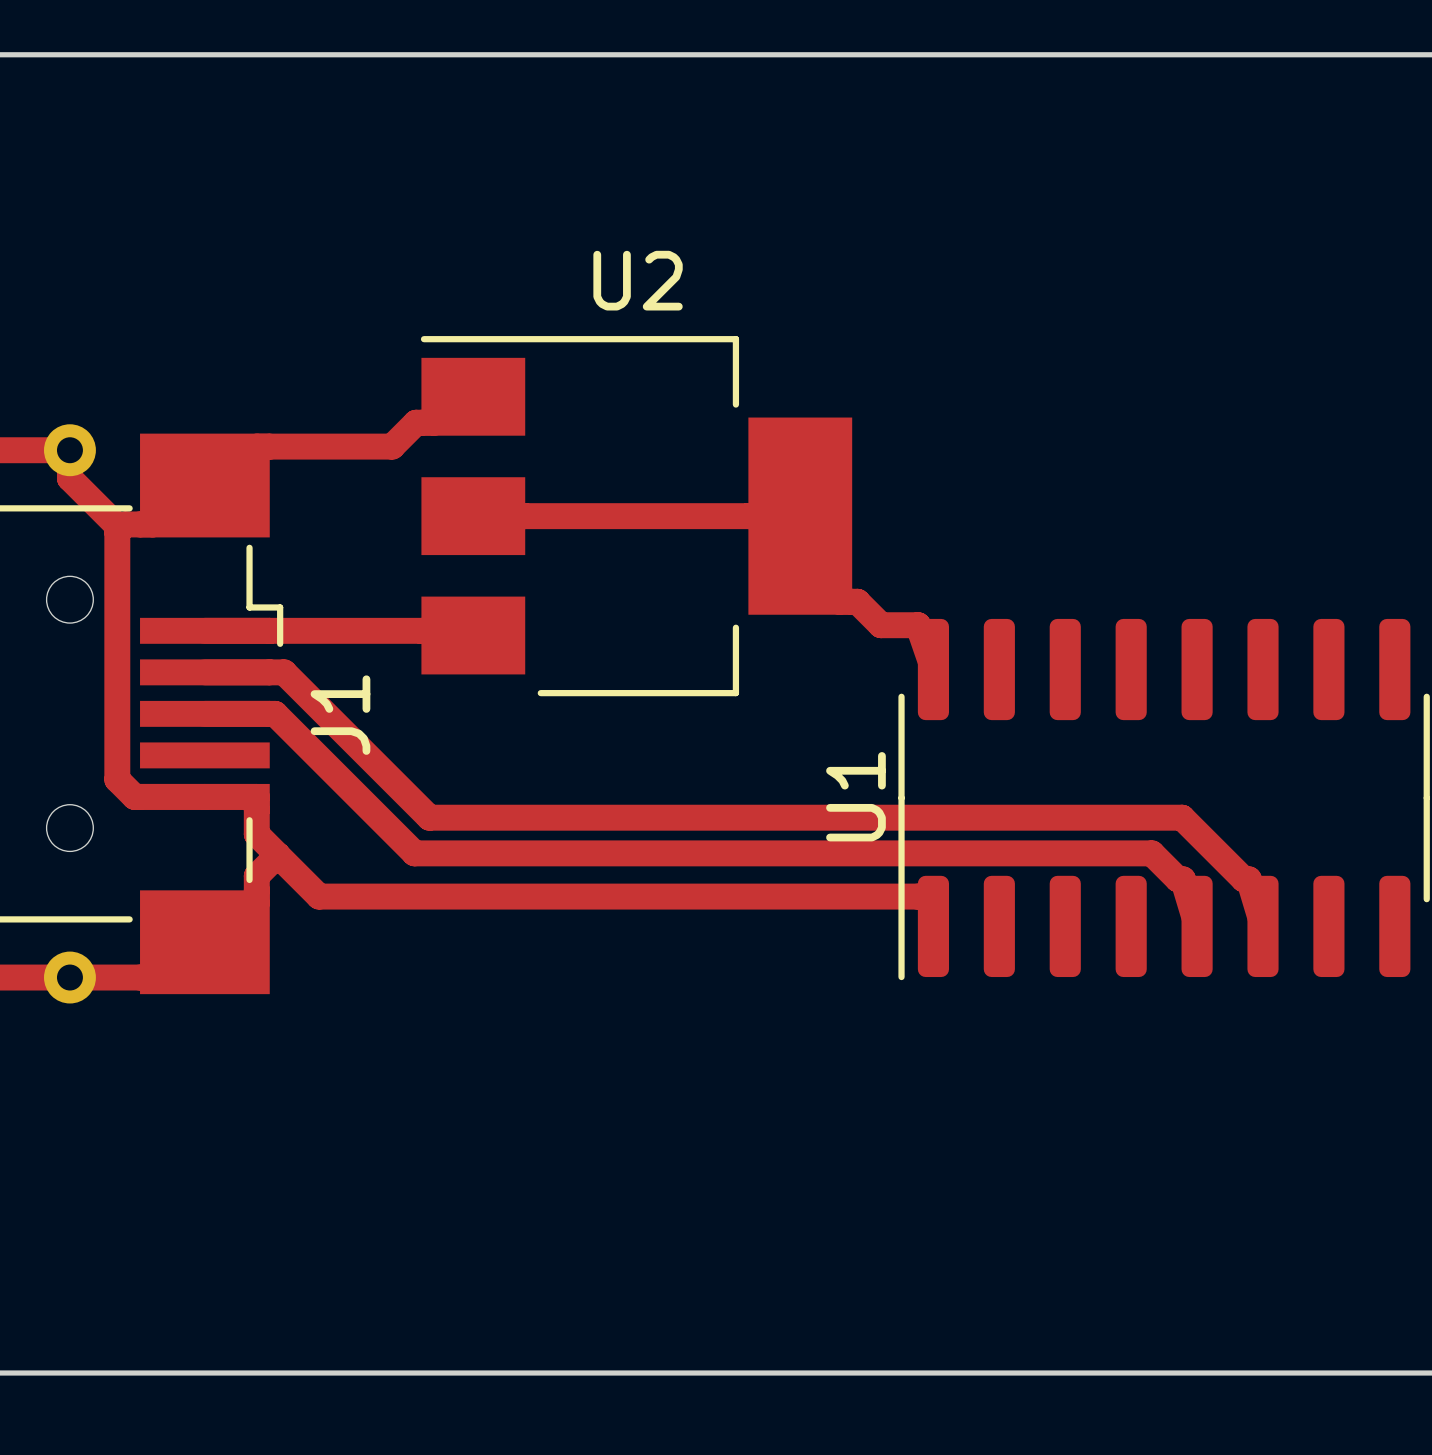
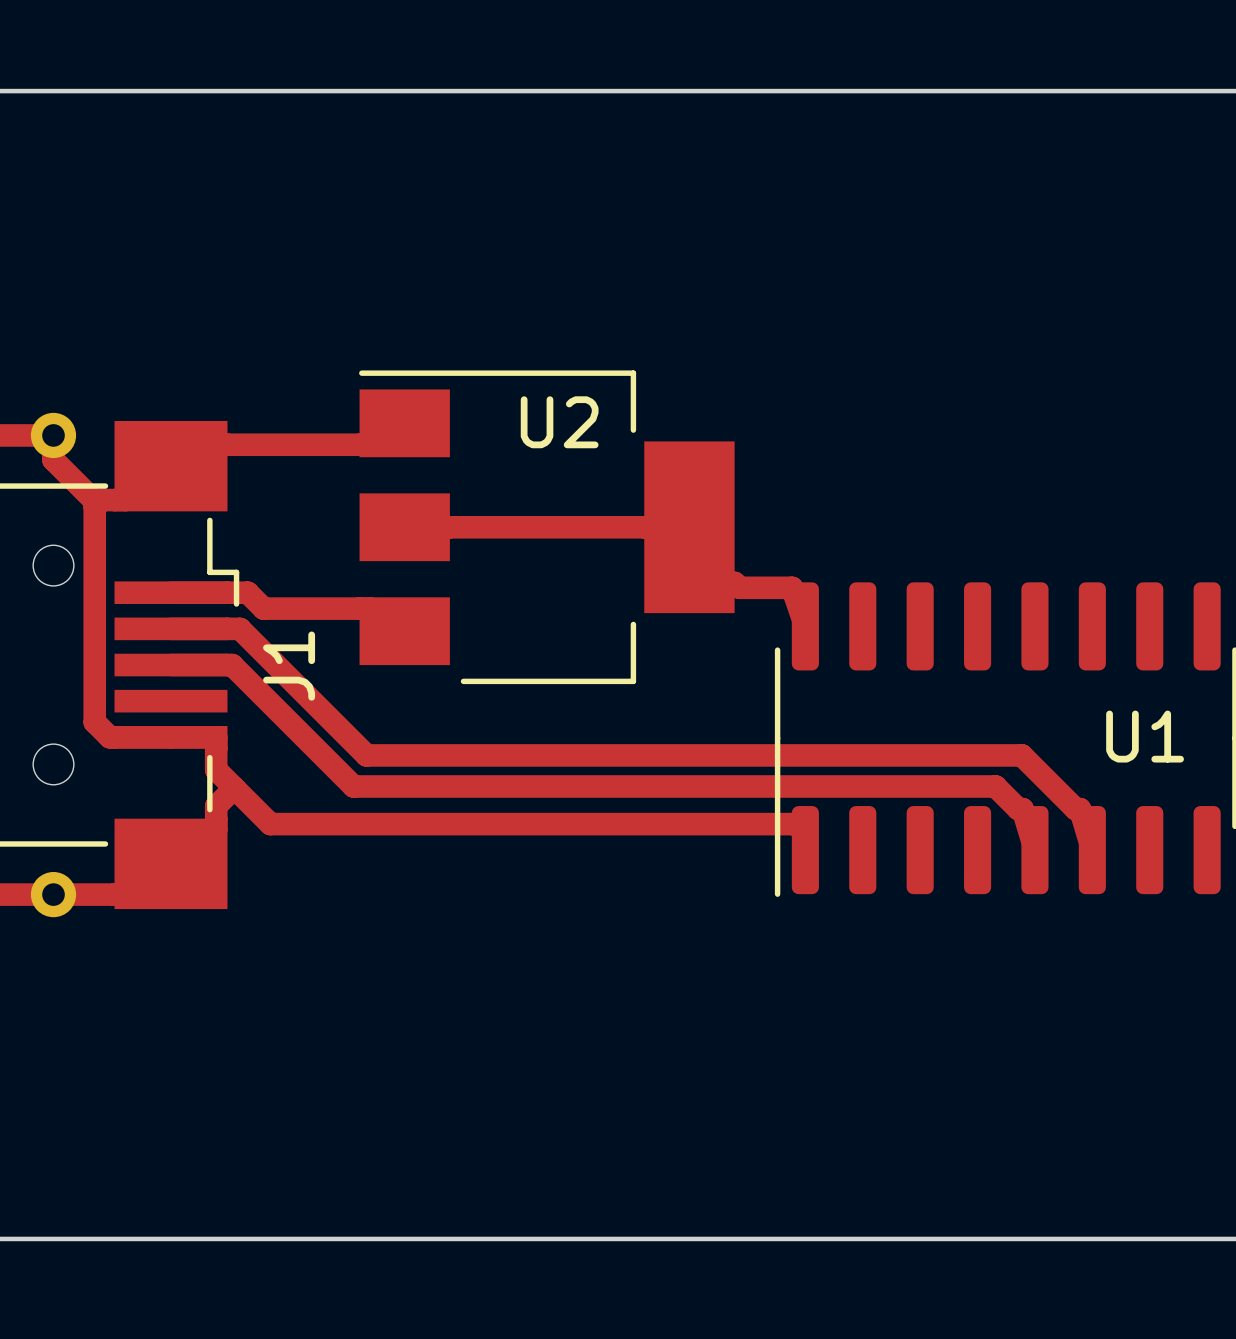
U2 name position: U2 (638, 280) -> U2 (559, 422)
top track: (473, 396) (434, 422) (416, 422) (392, 446) (256, 446) (204, 485) -> (404, 423) (370, 444) (216, 444) (171, 466)
top track: (473, 516) (800, 516) (839, 601) (857, 601) (880, 625) -> (404, 527) (689, 527) (723, 582) (734, 582) (739, 587) (759, 587)
U2 position: (636, 516) -> (546, 527)
top track: (293, 630) (434, 630) (473, 635) -> (247, 592) (263, 608) (370, 608) (404, 631)
U1 name rotation: 0° (855, 796) -> 90° clockwise (1145, 736)
U1 name position: U1 (855, 796) -> U1 (1145, 736)

